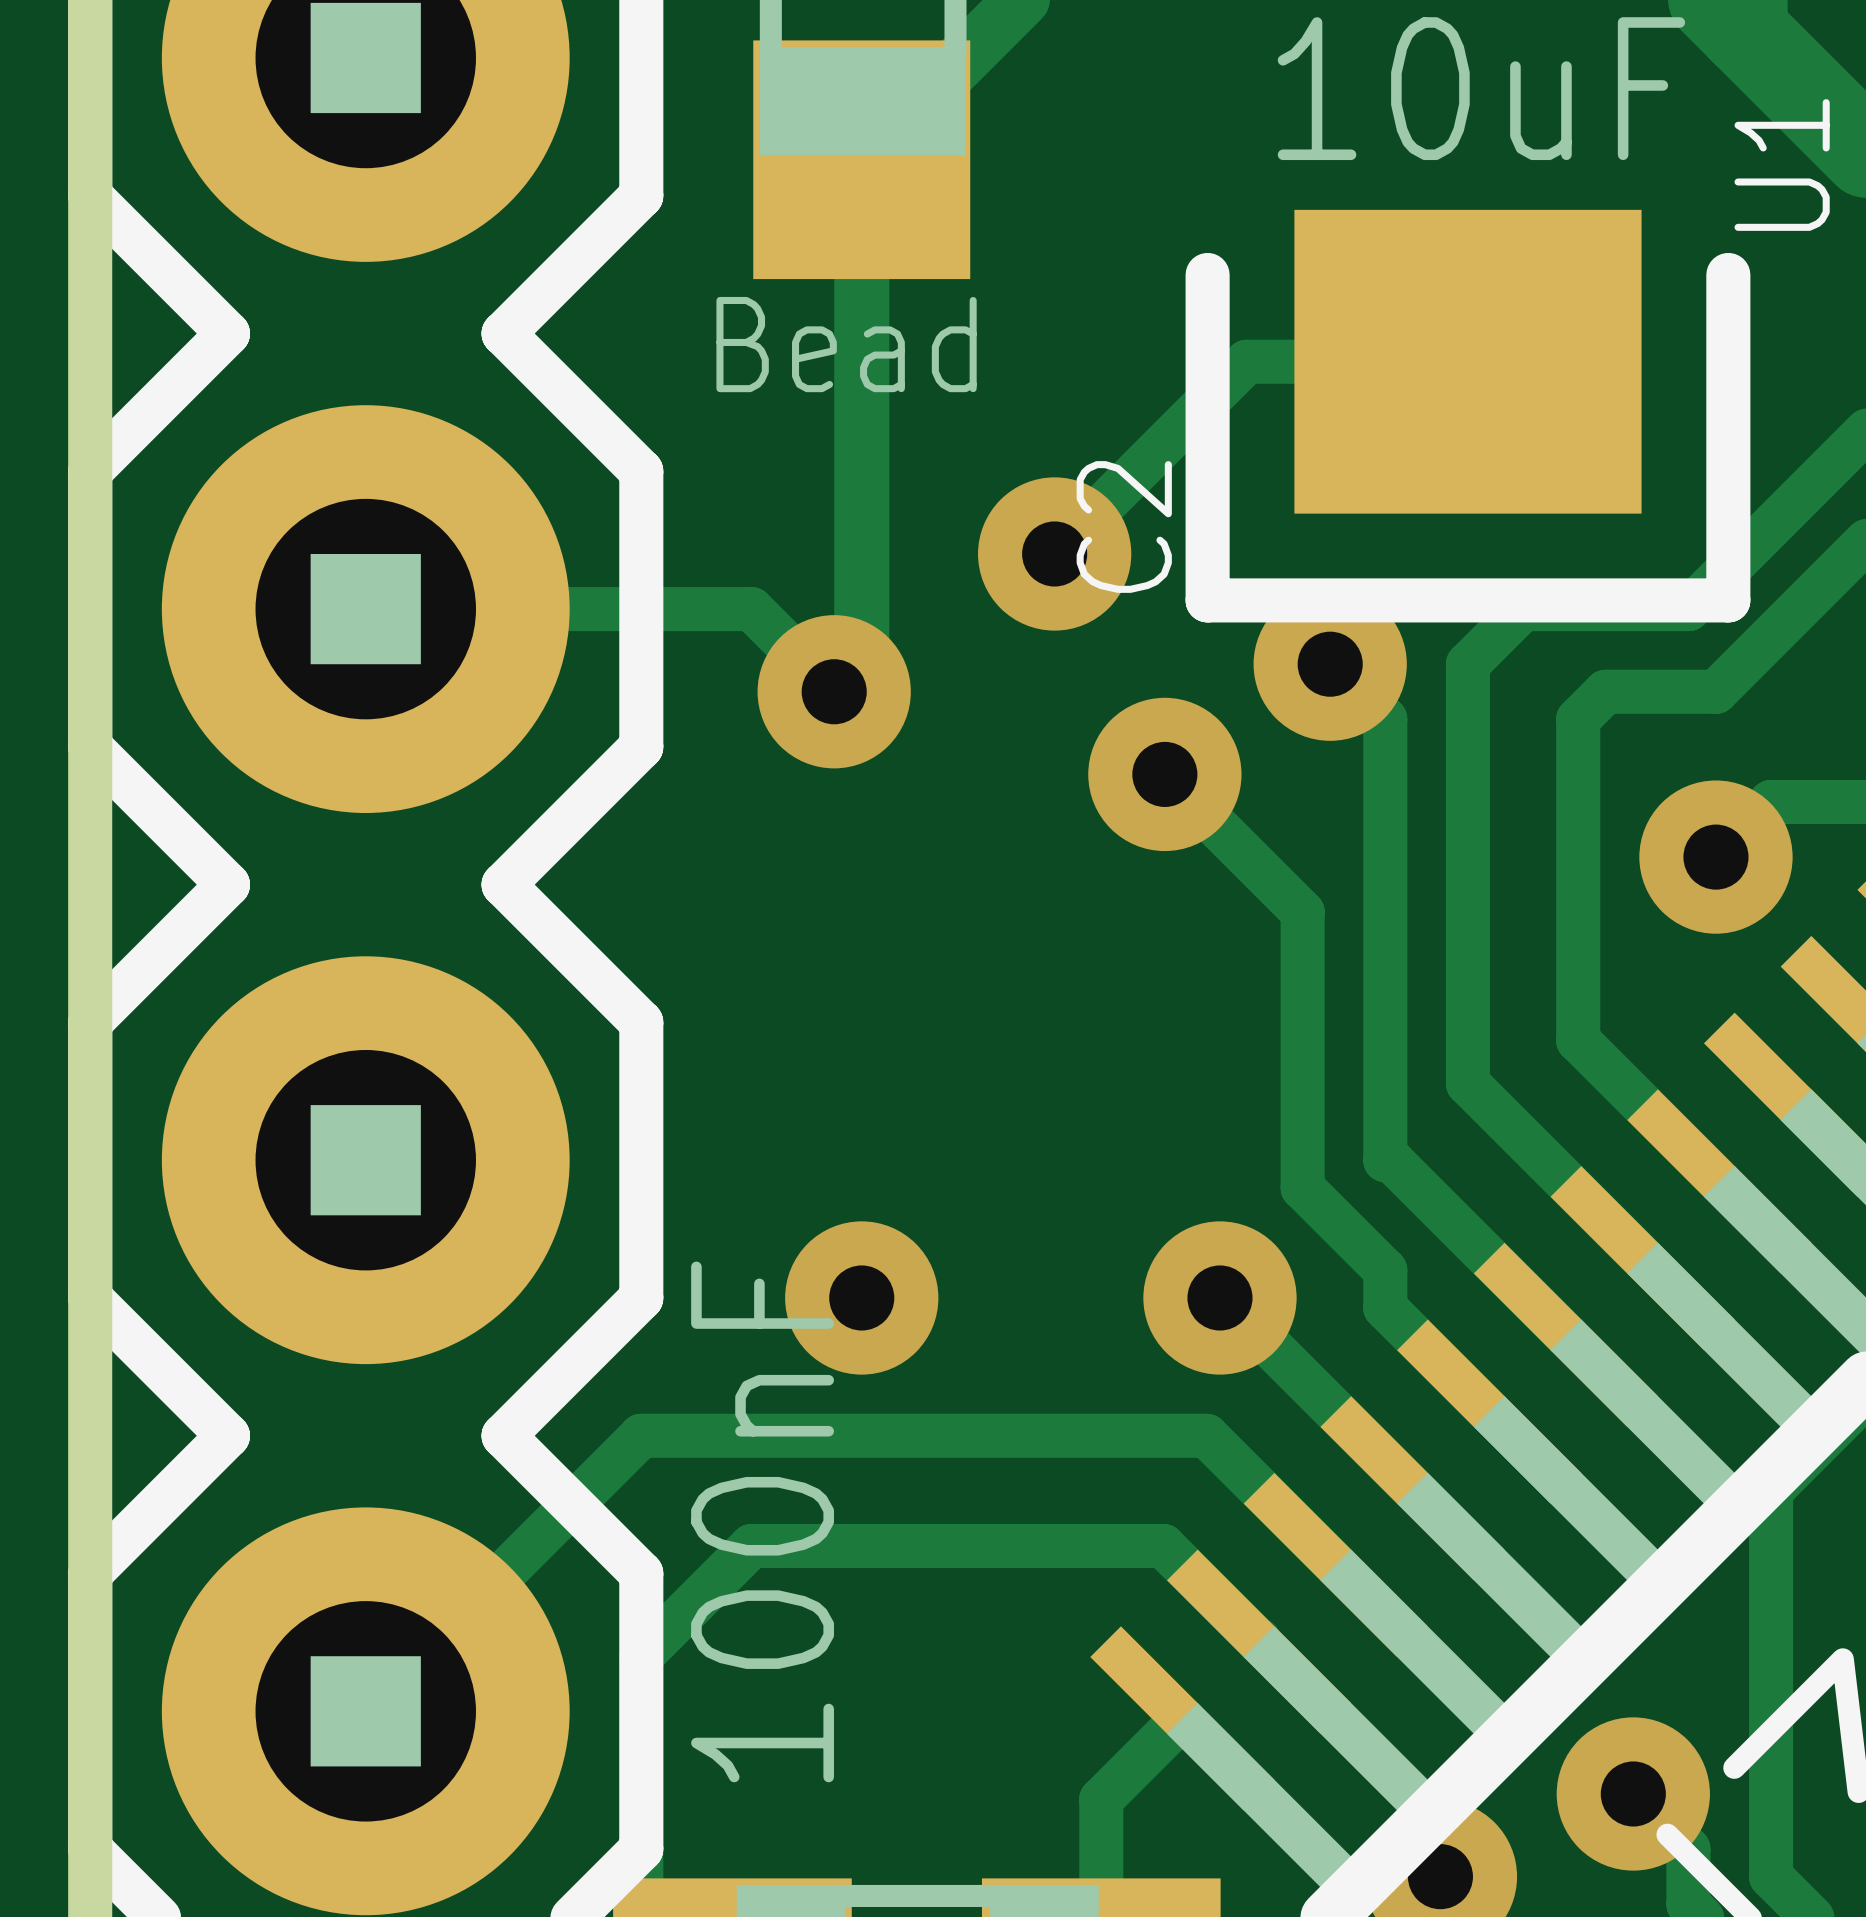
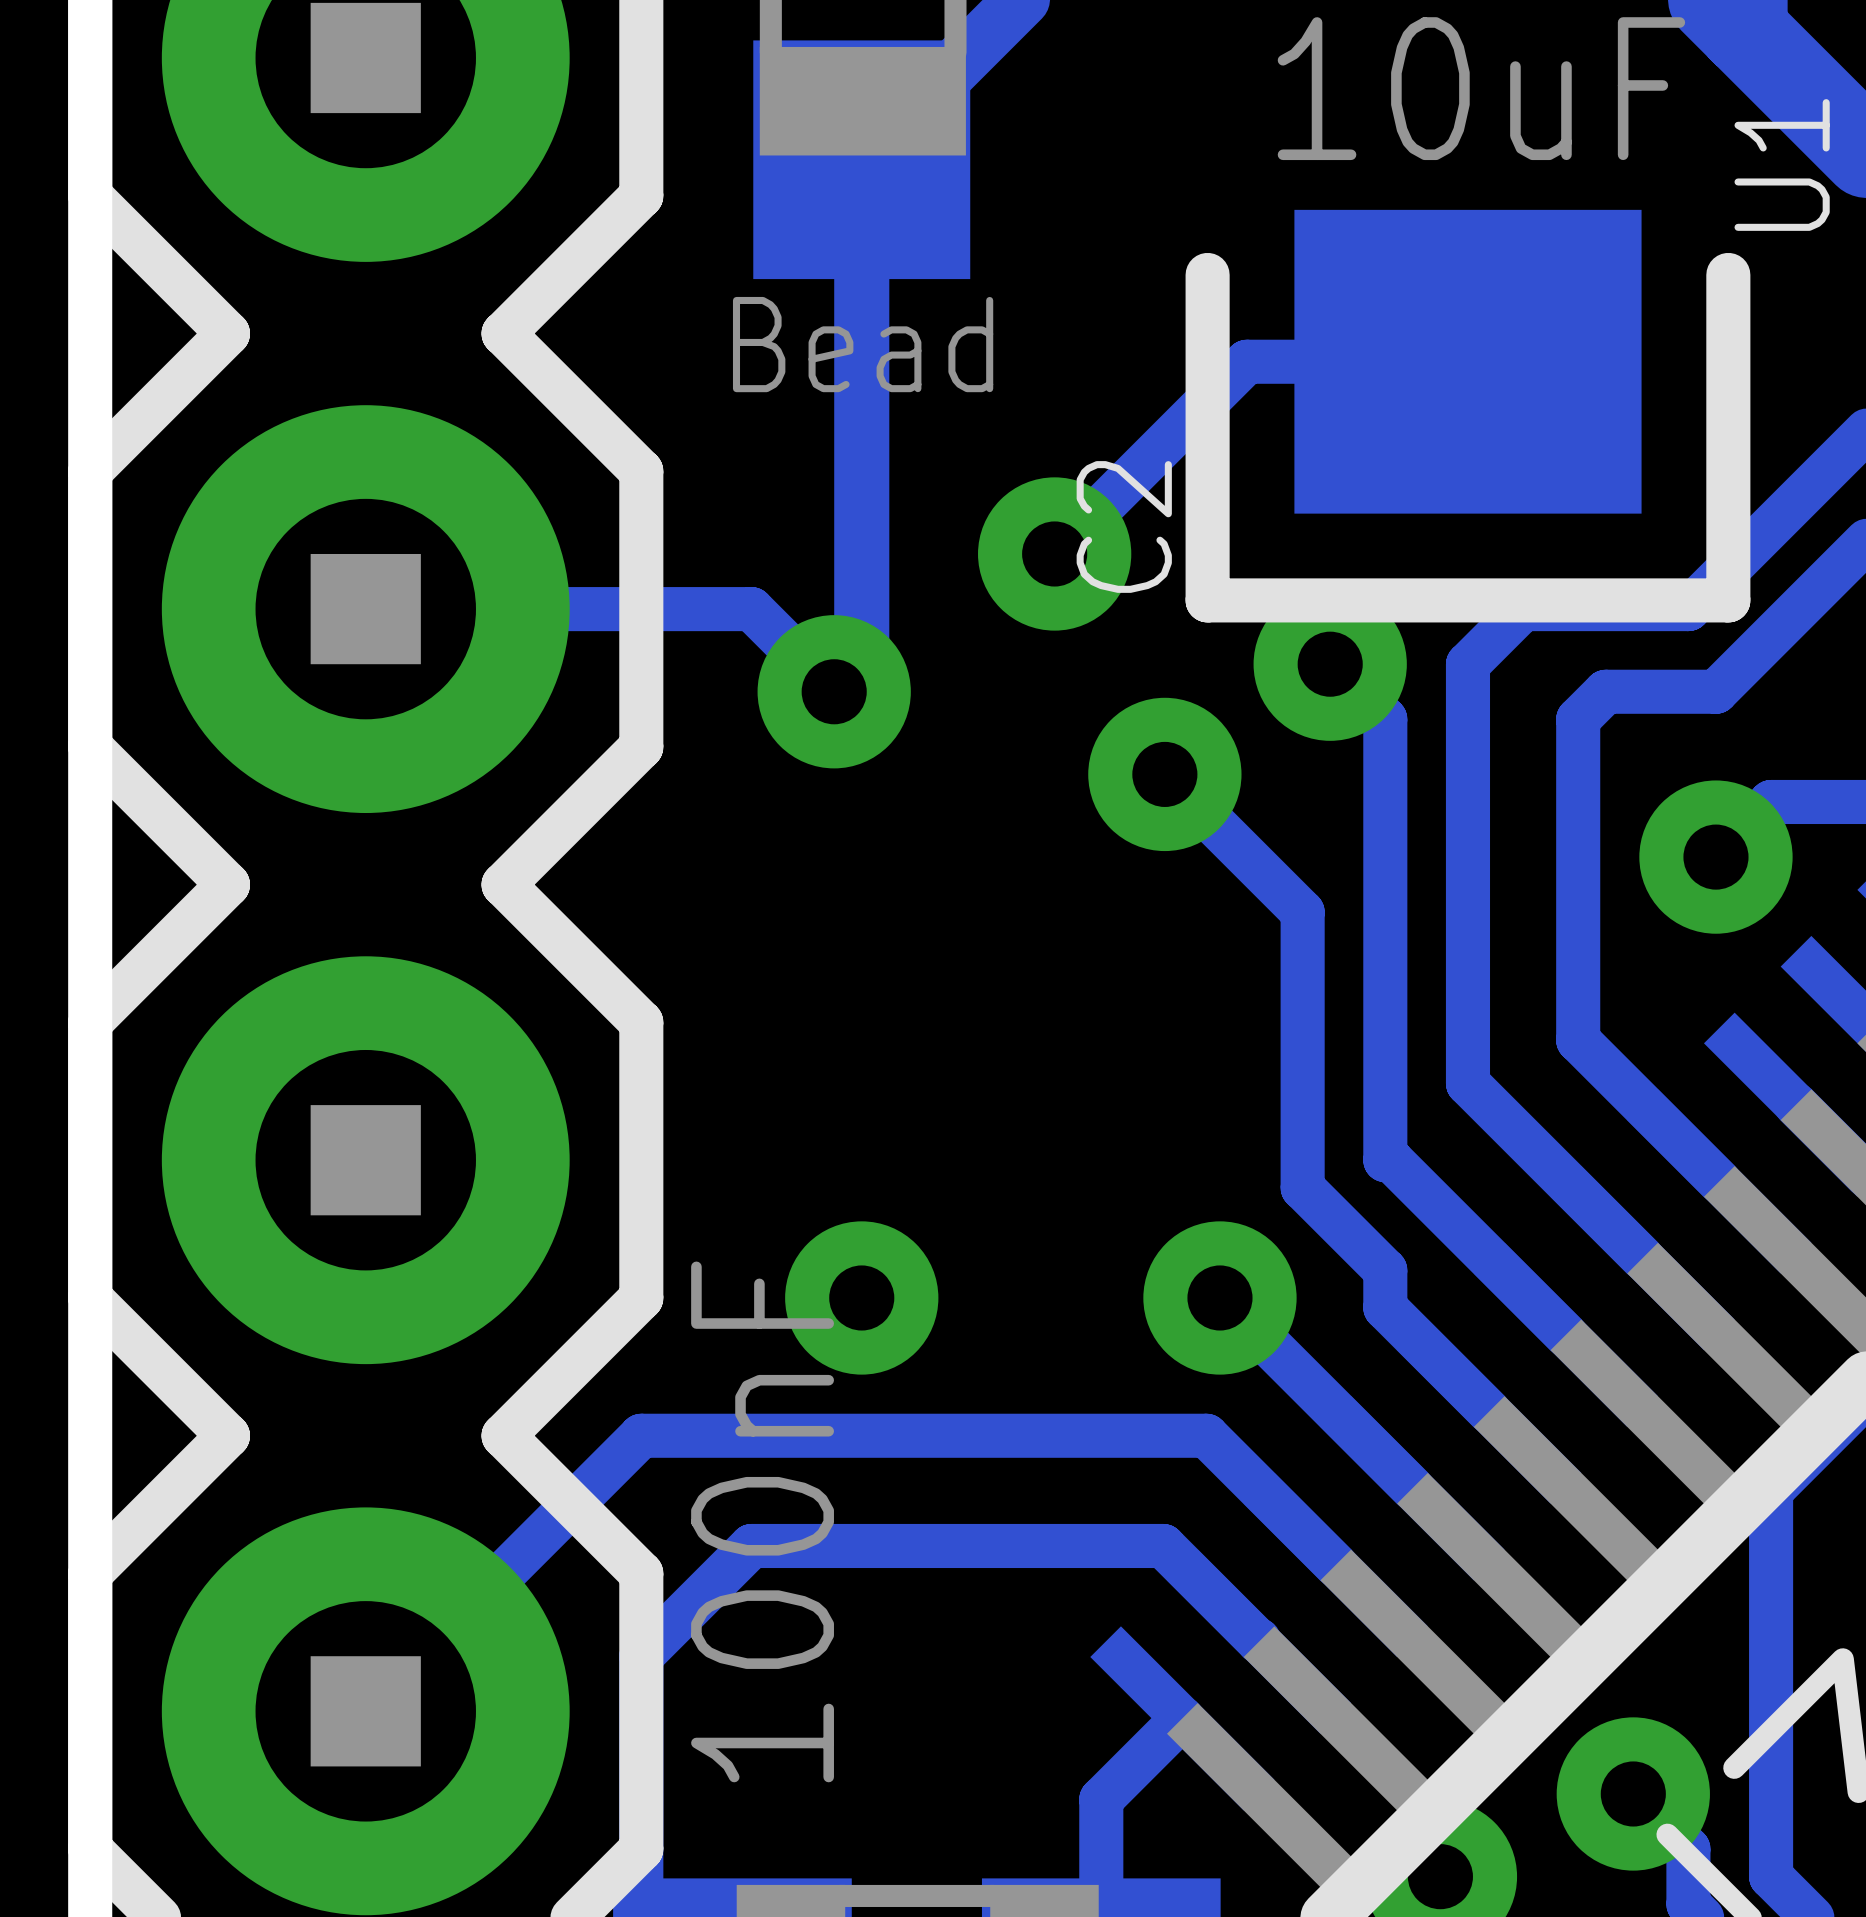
part value position: Bead (846, 344) -> Bead (863, 344)

